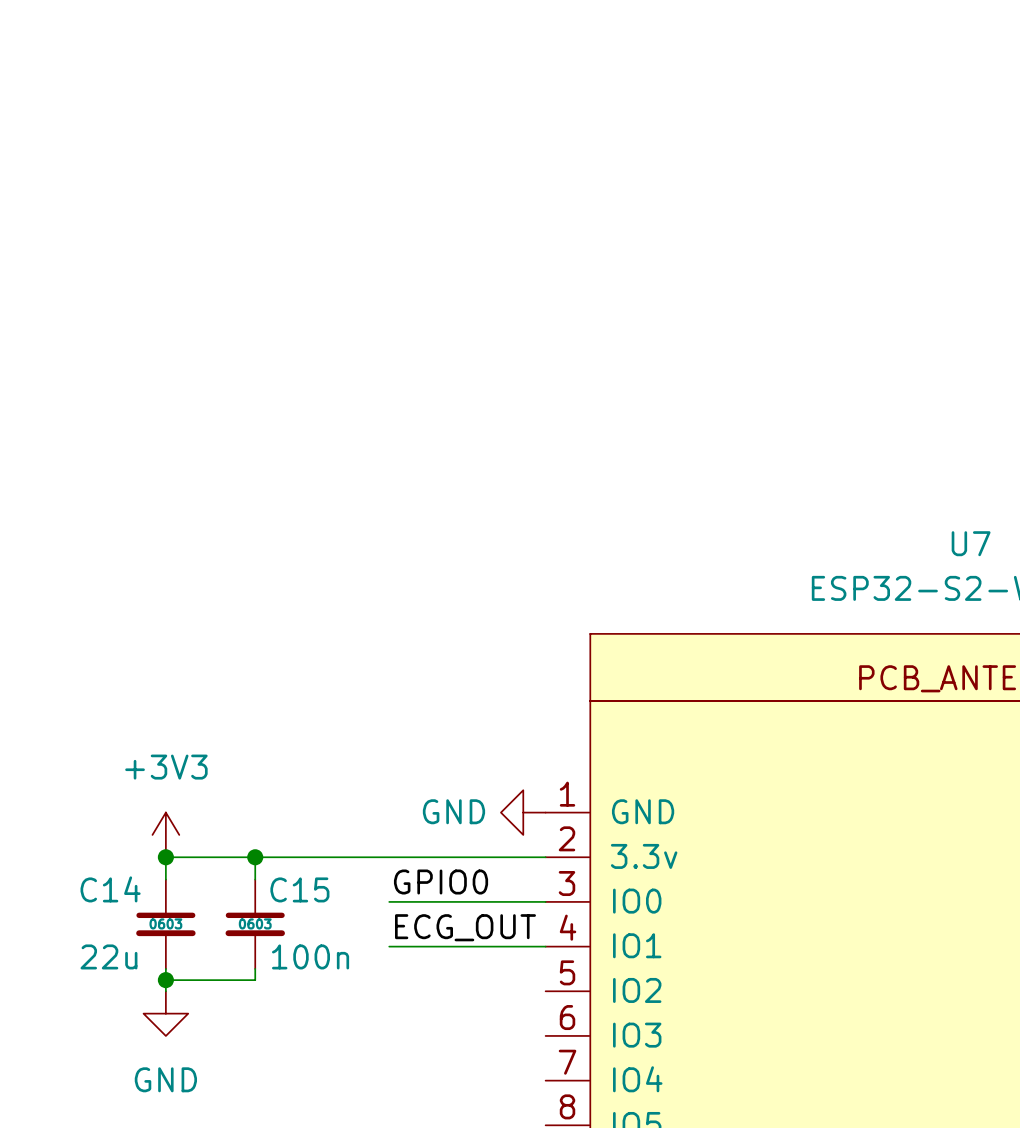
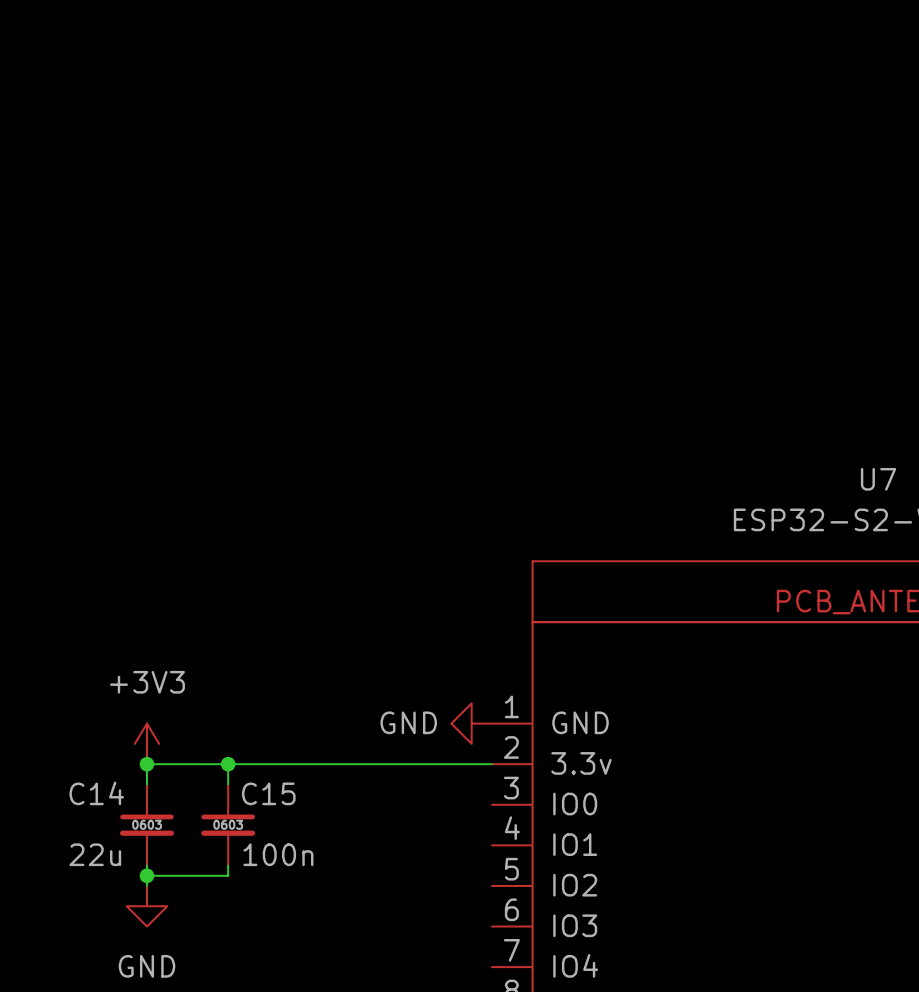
label: GPIO0 (441, 882) -> none
wire: (389, 901) (545, 901) -> none
label: ECG_OUT (465, 927) -> none
wire: (389, 946) (545, 946) -> none

